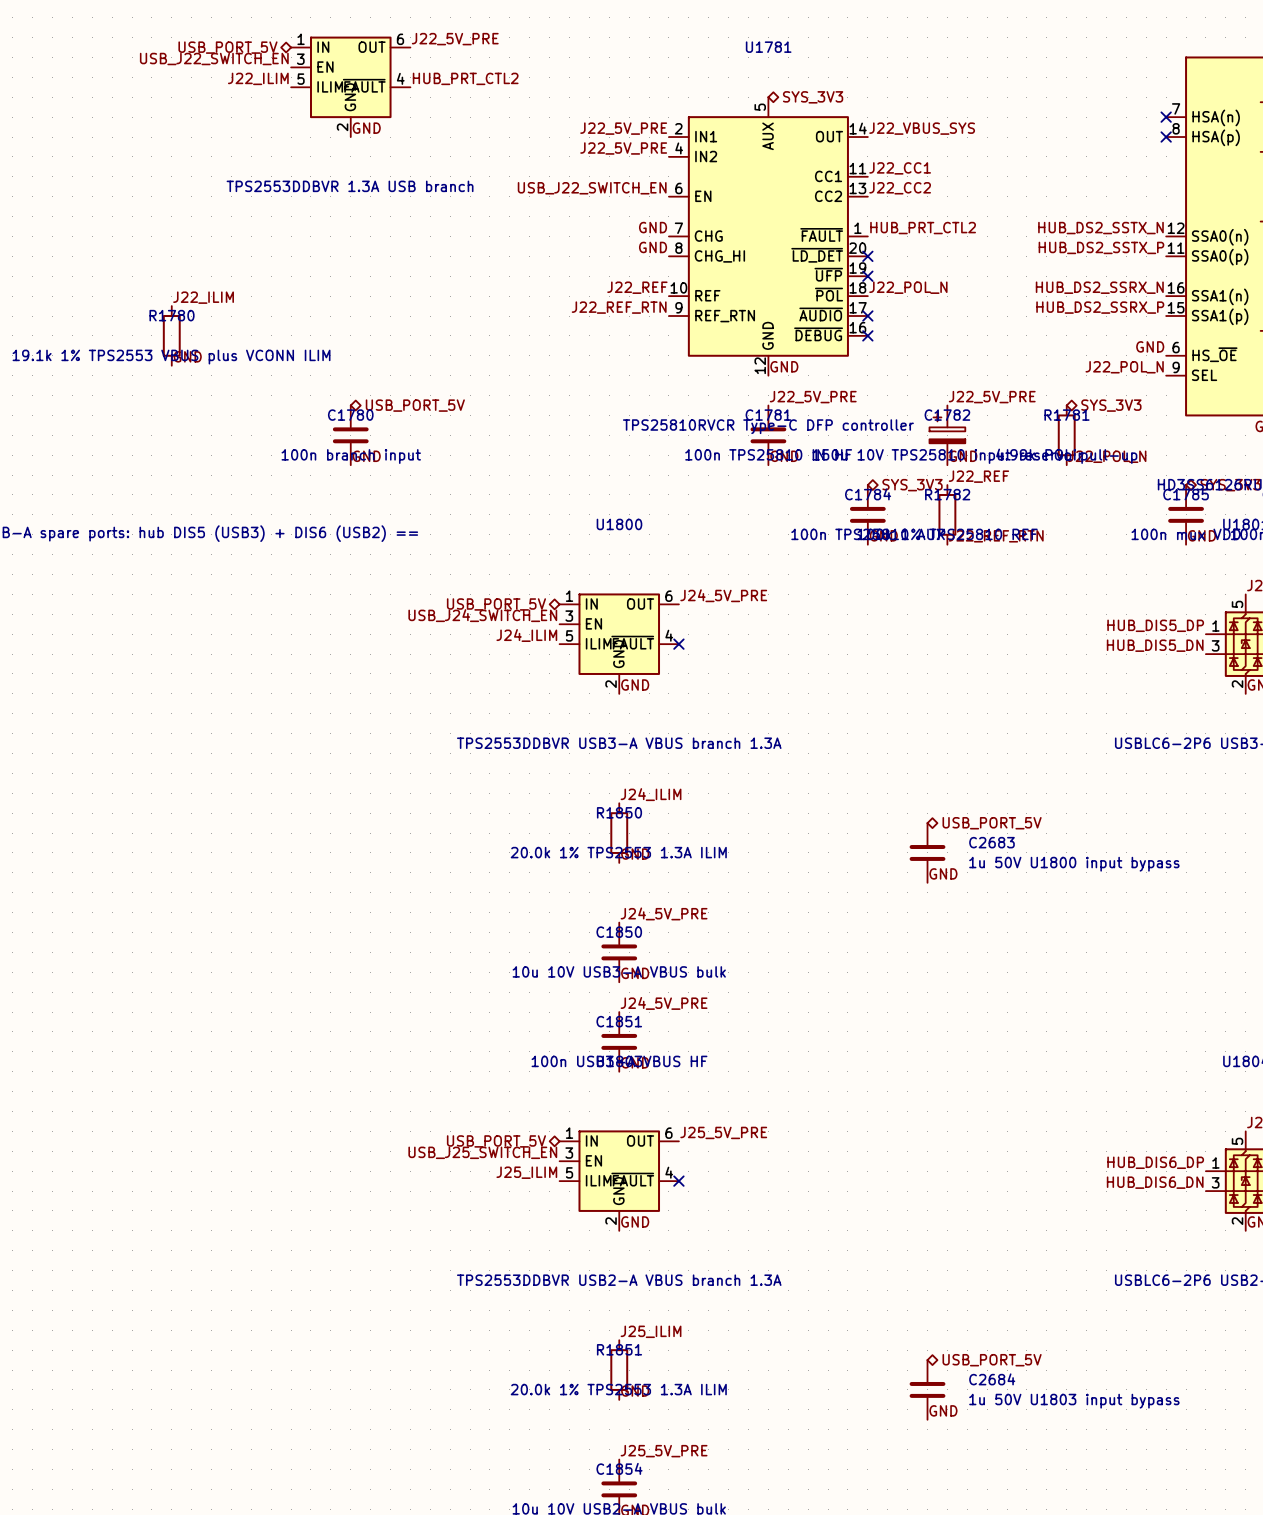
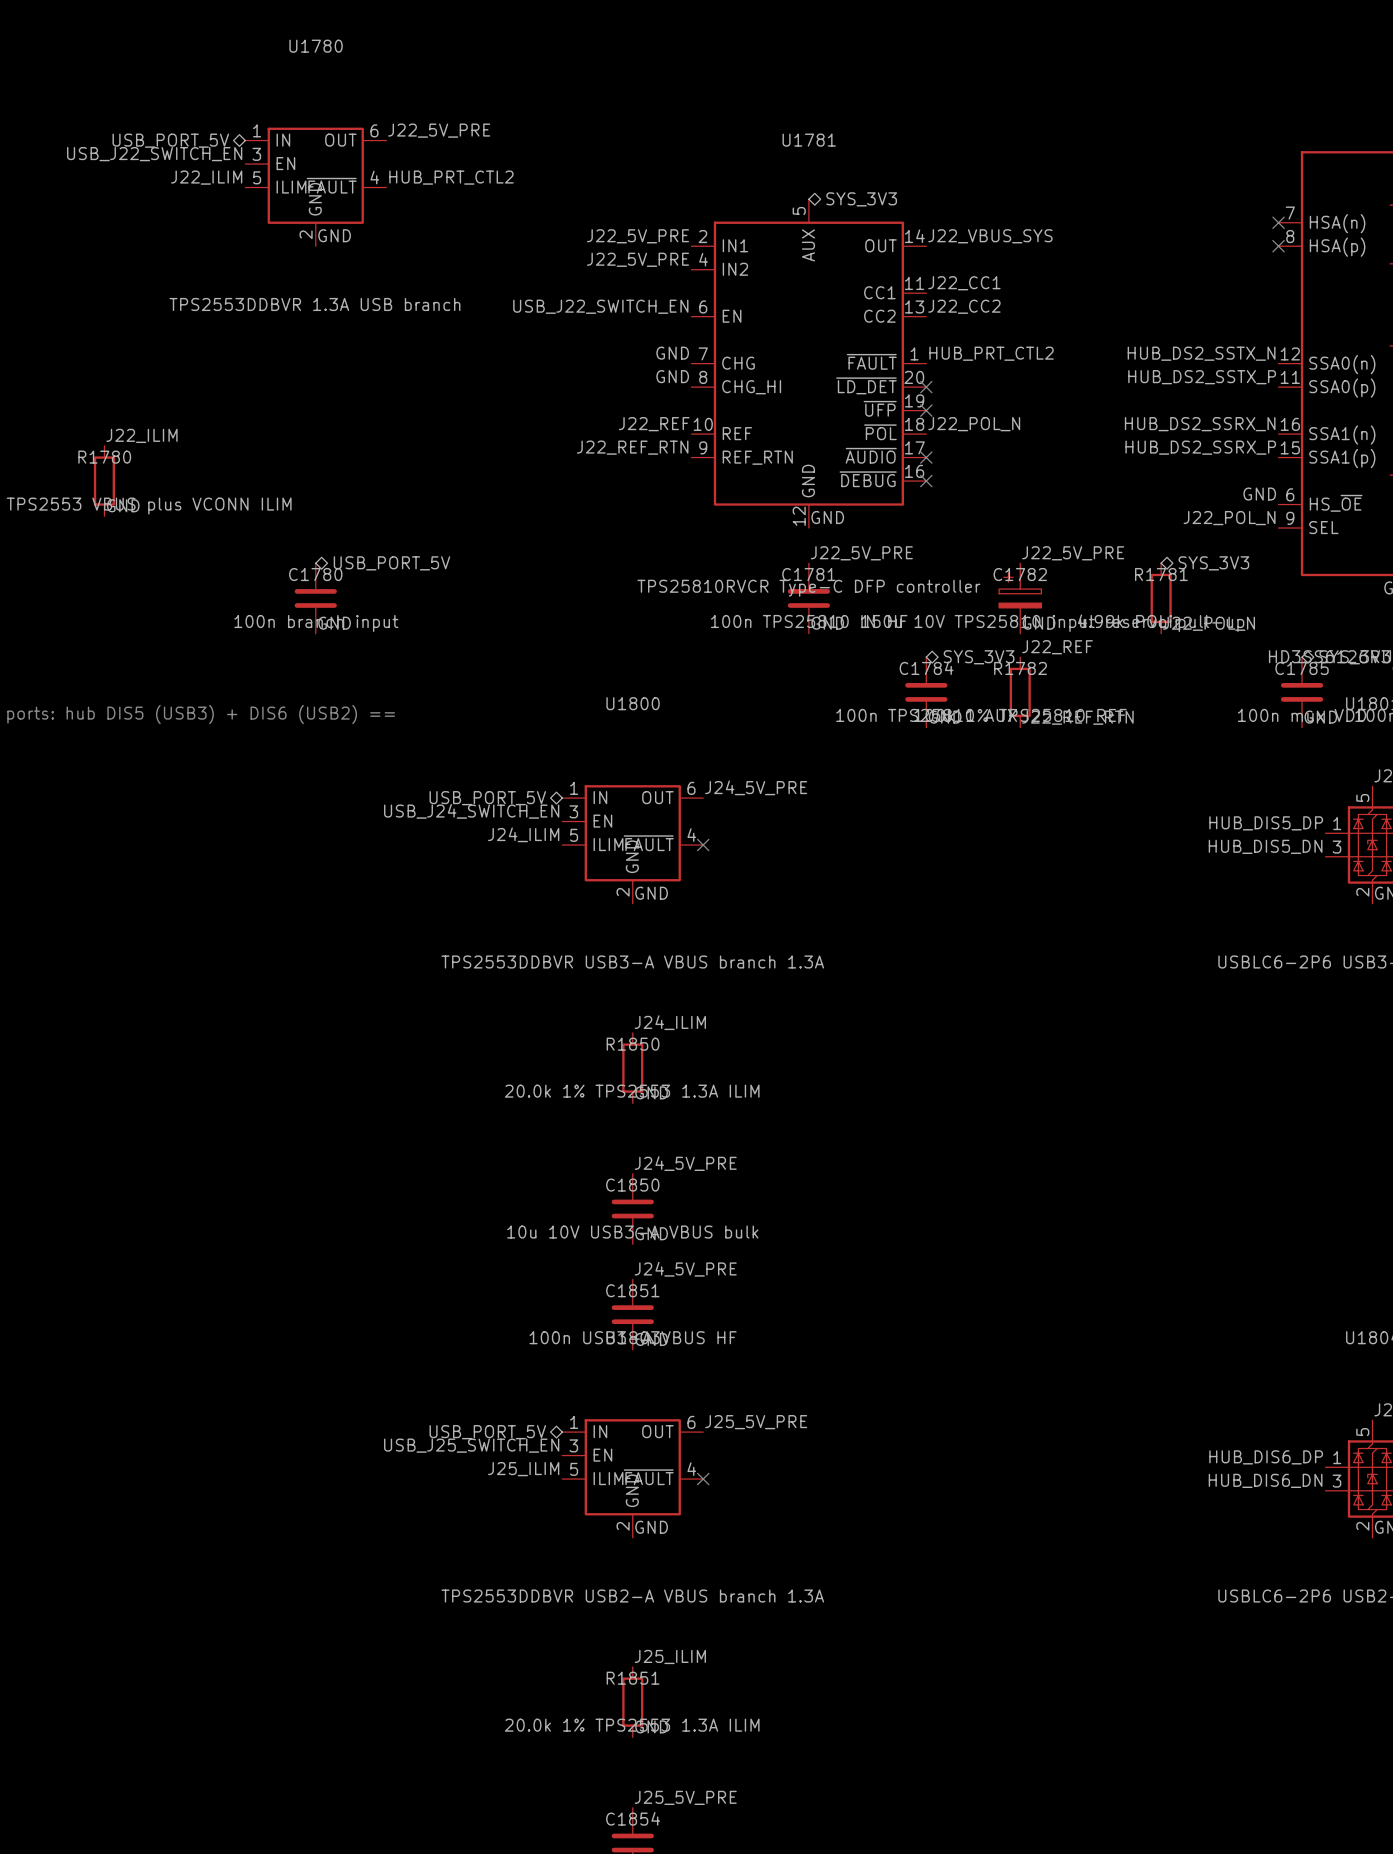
hierarchical label: USB_PORT_5V (992, 823) -> none
C2683: 1u 50V U1800 input bypass (927, 852) -> none
label: GND (943, 873) -> none
hierarchical label: USB_PORT_5V (992, 1360) -> none
C2684: 1u 50V U1803 input bypass (927, 1389) -> none
label: GND (943, 1410) -> none

